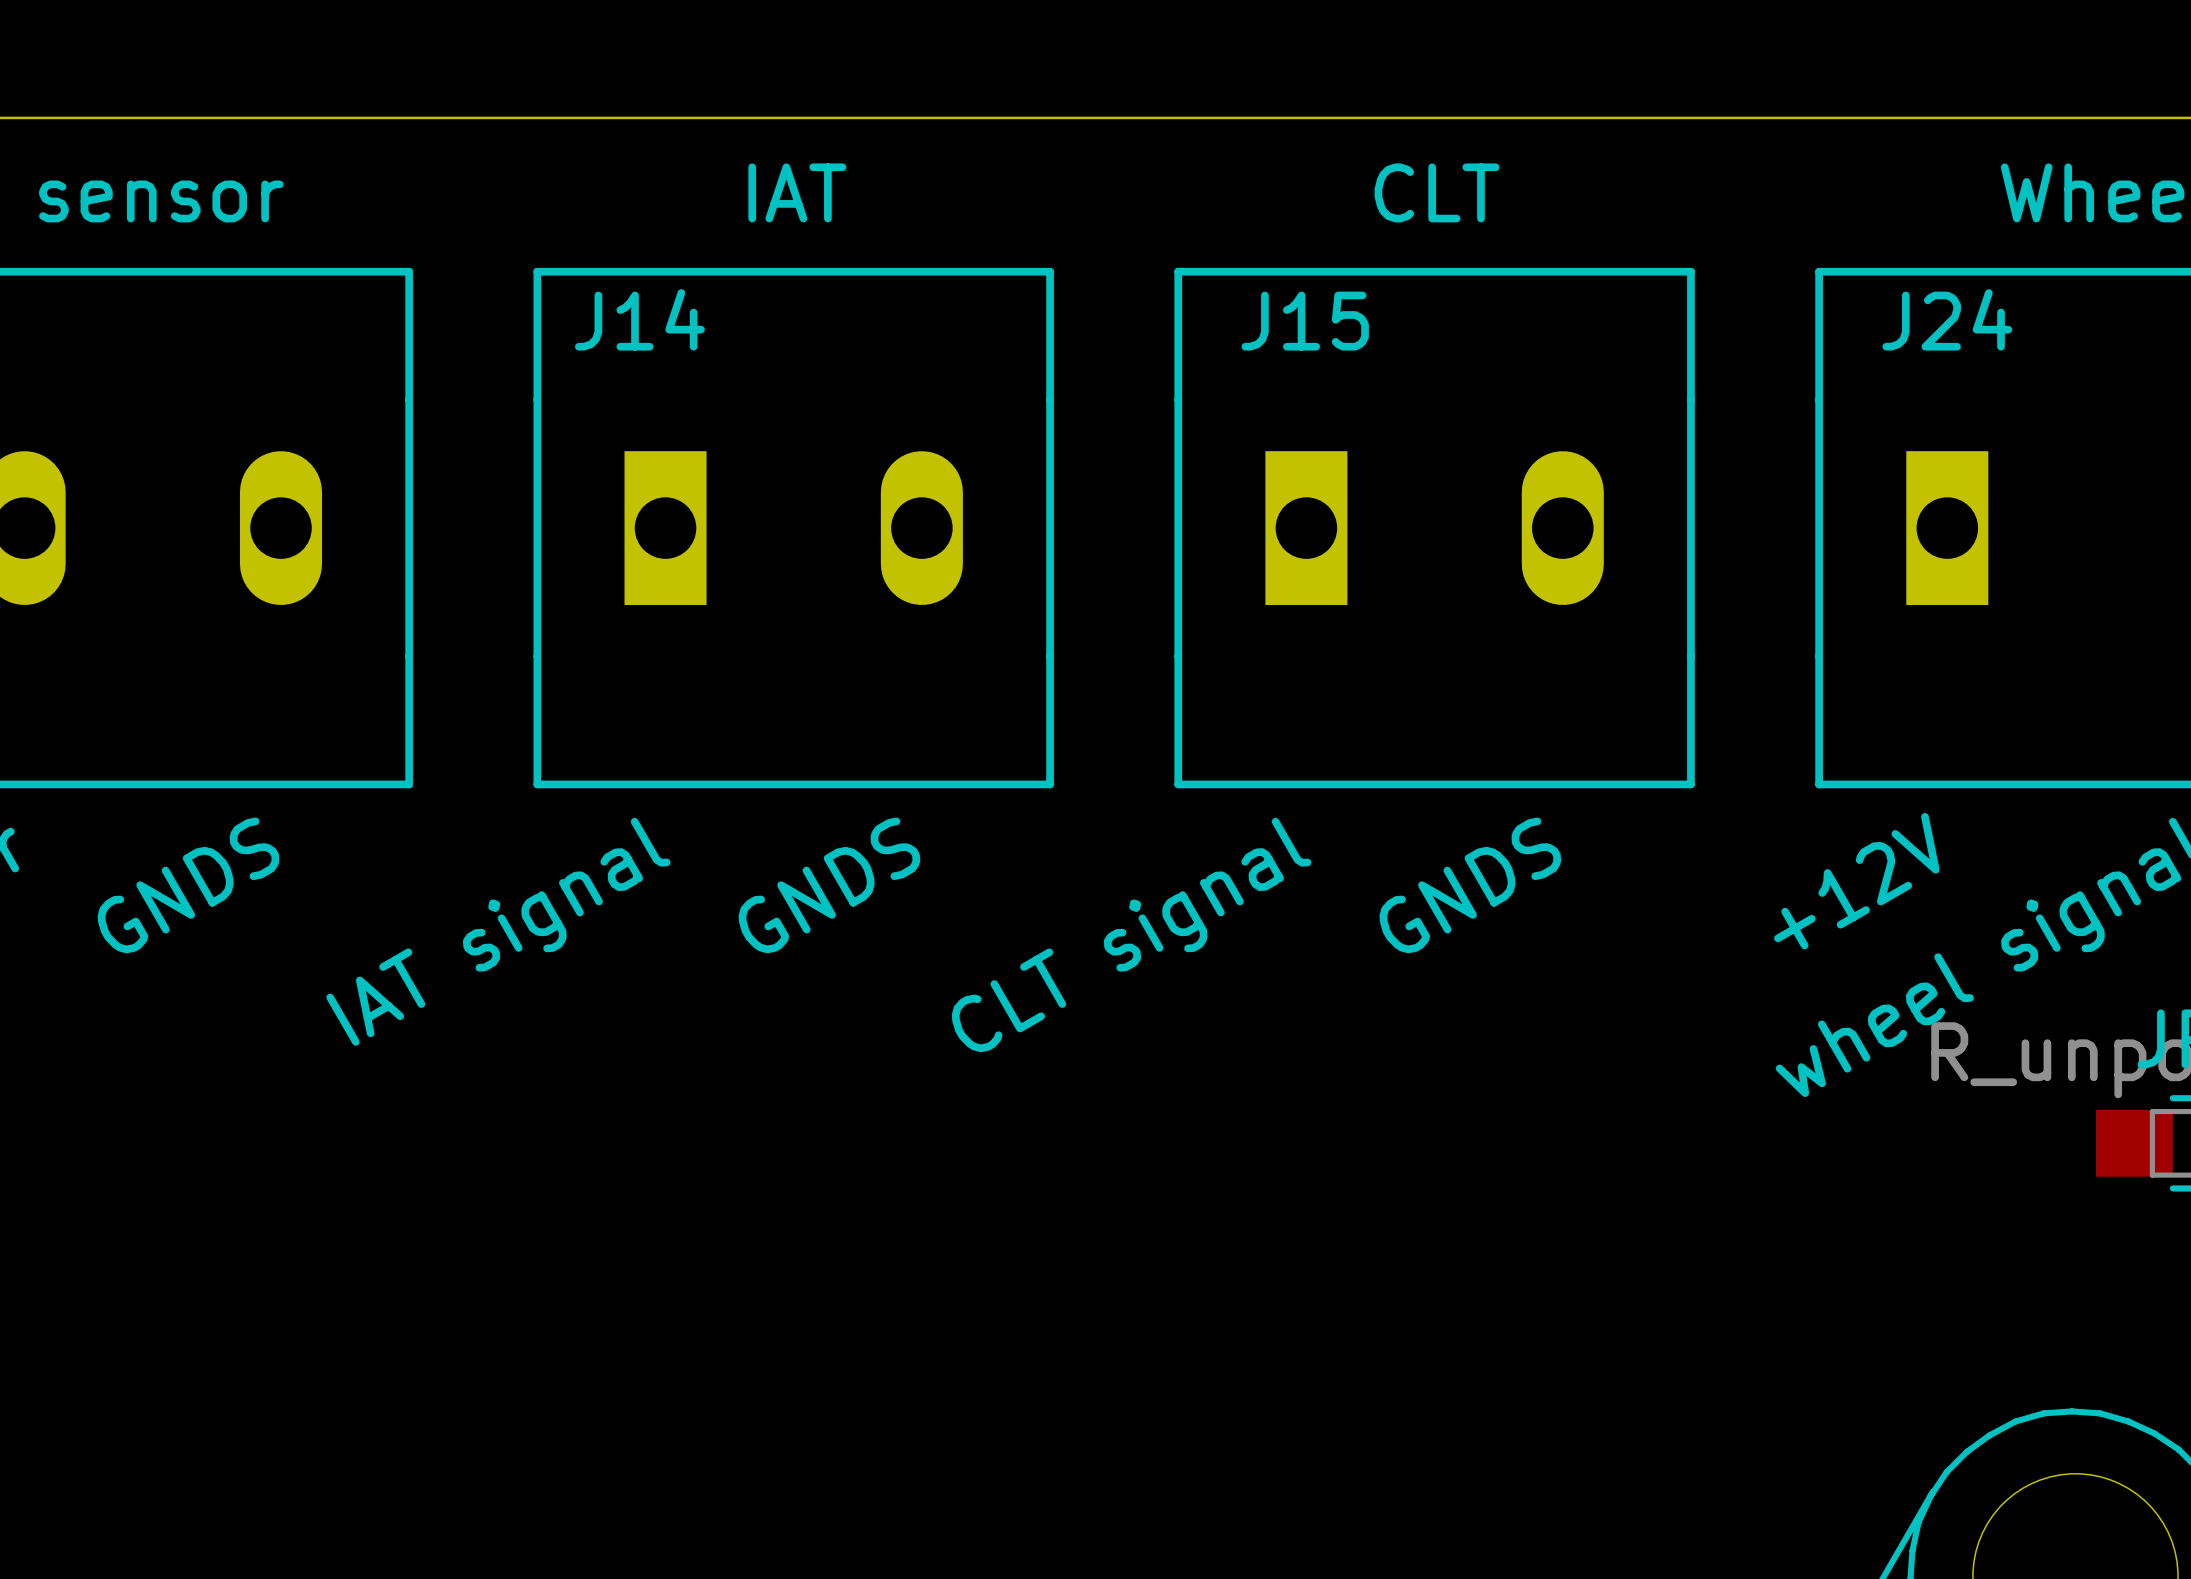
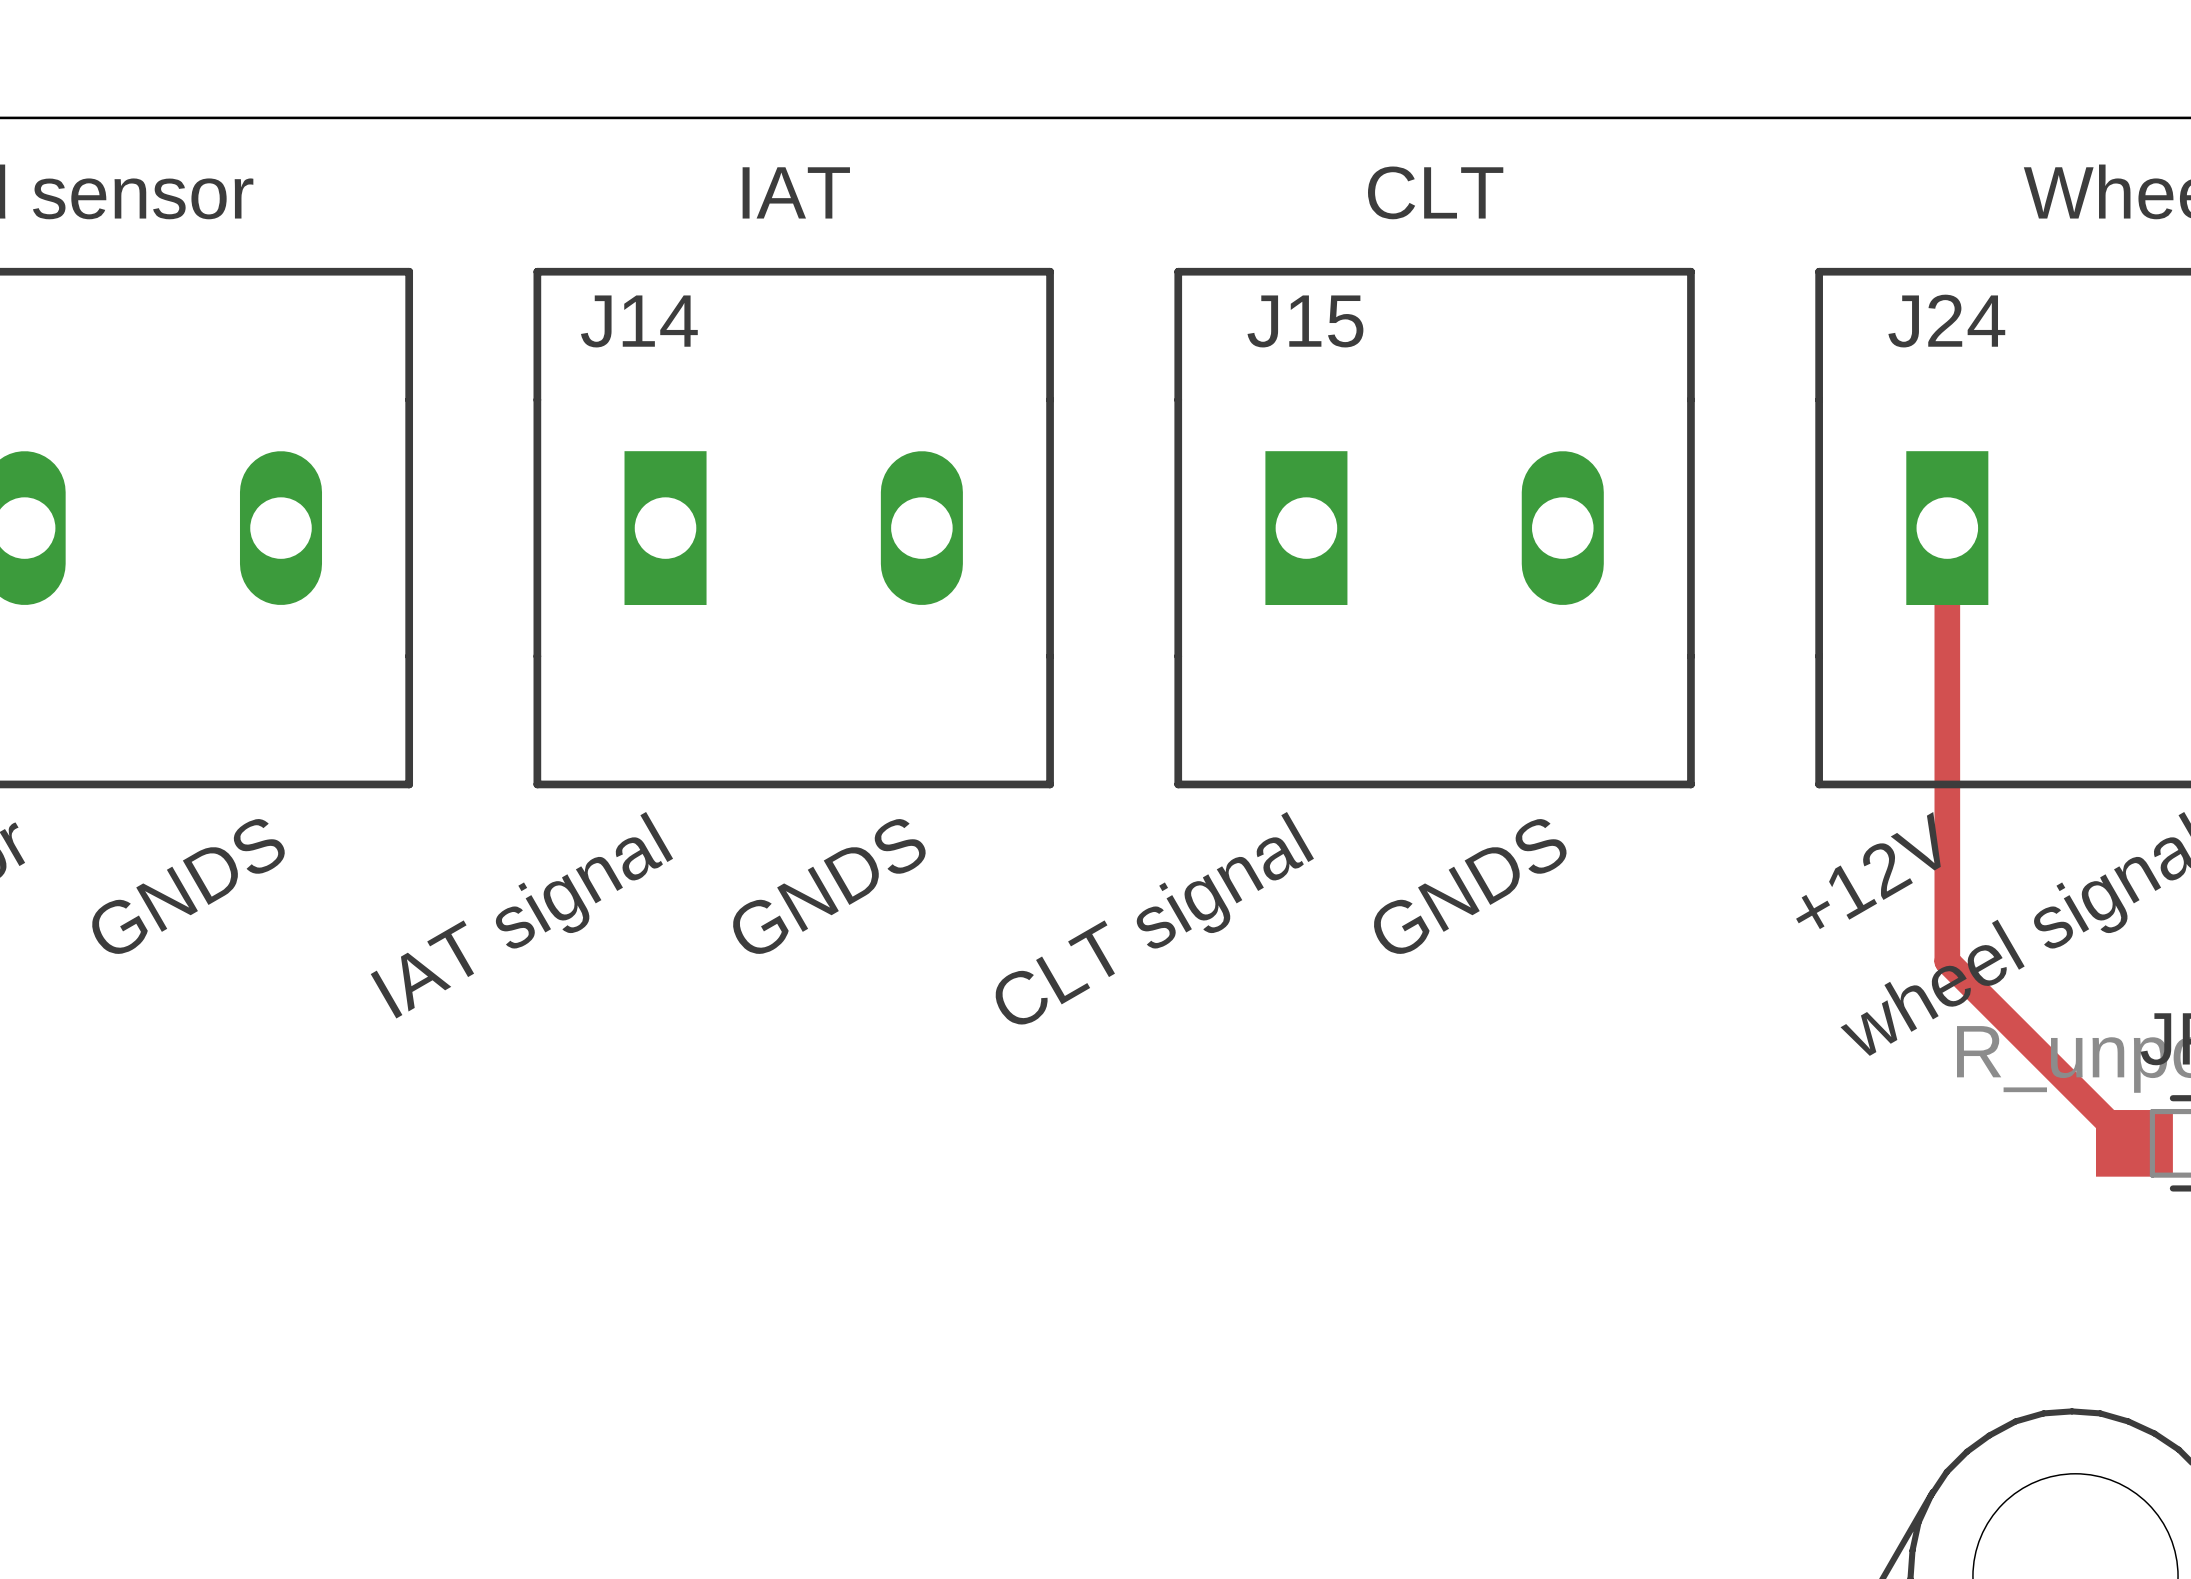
track: none -> (1947, 528) (1947, 961) (2129, 1143) (2134, 1143)

